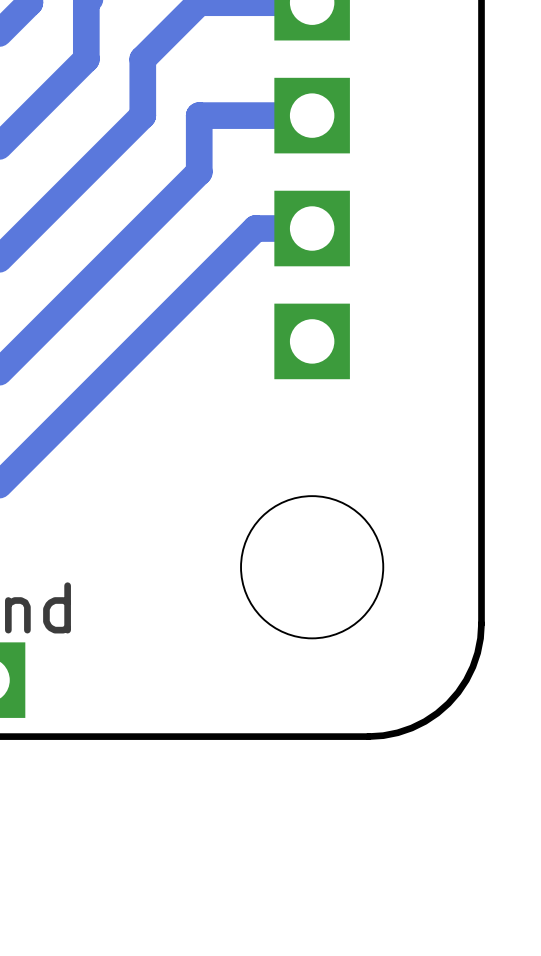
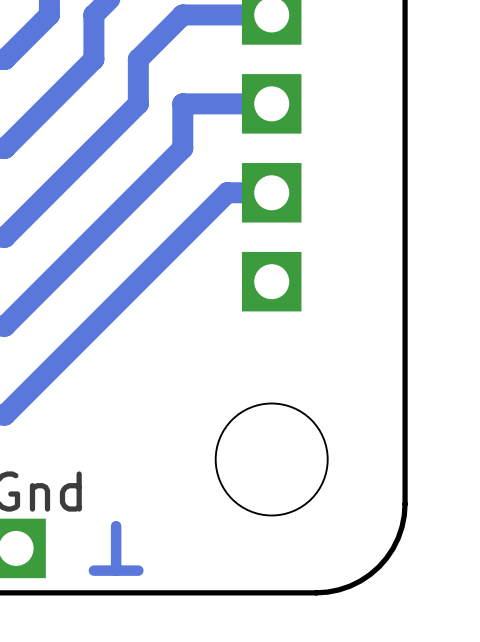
track: none -> (116, 526) (116, 570)
track: none -> (138, 570) (93, 570)

